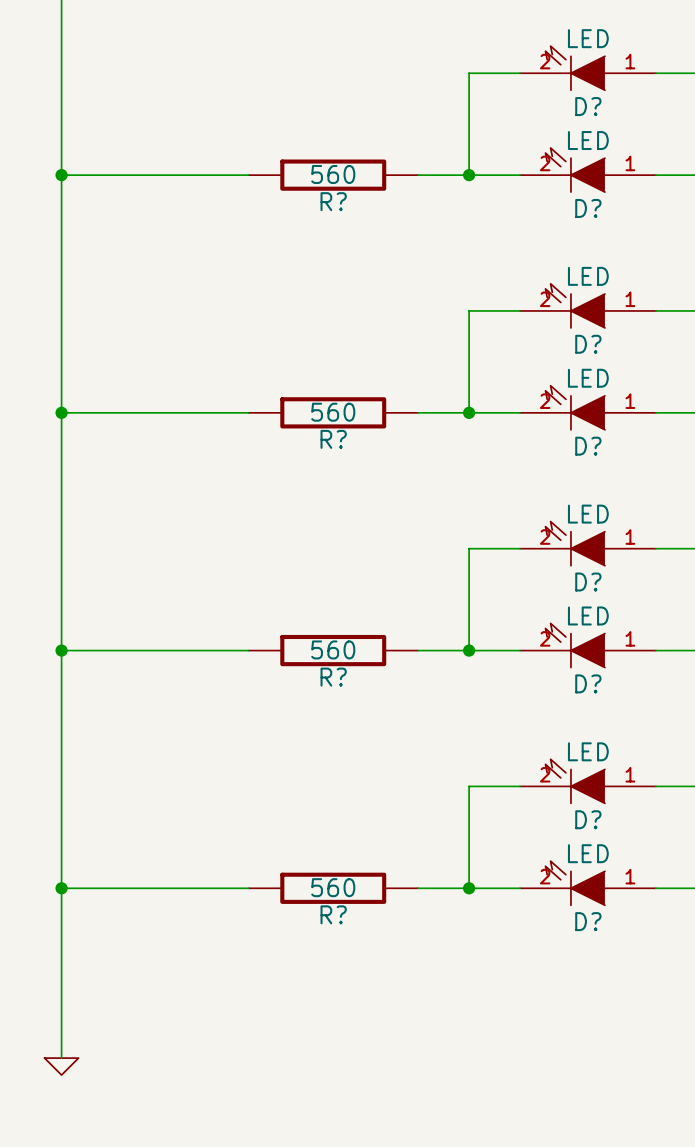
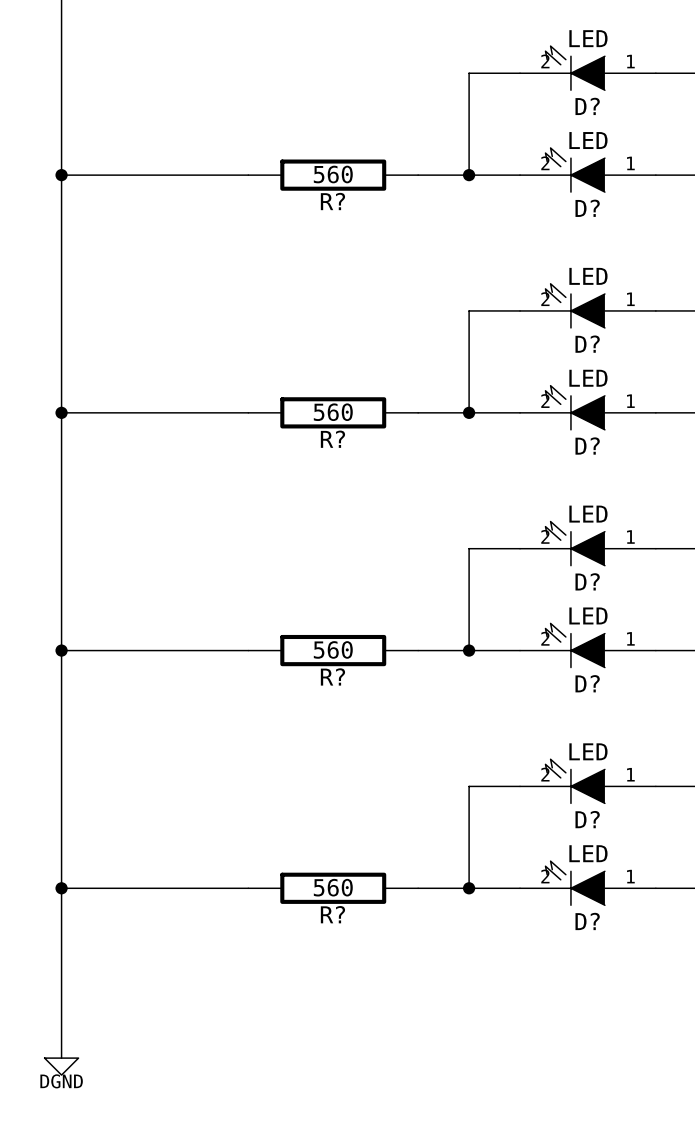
power symbol text: none -> DGND (61, 1081)

